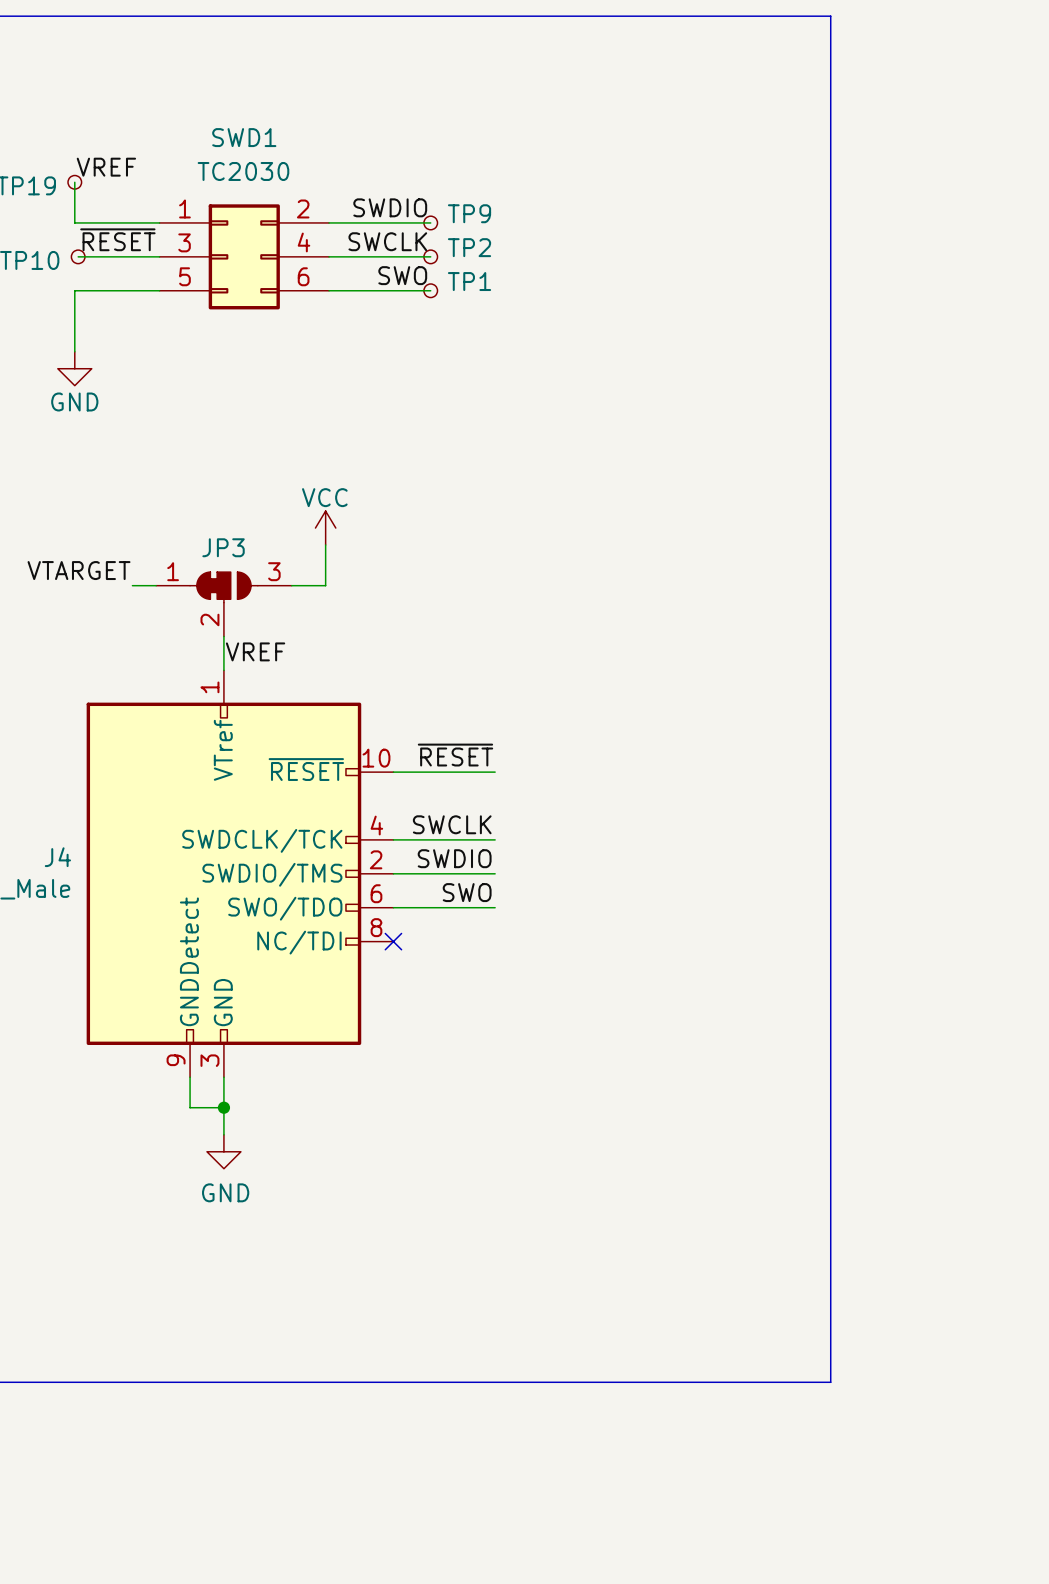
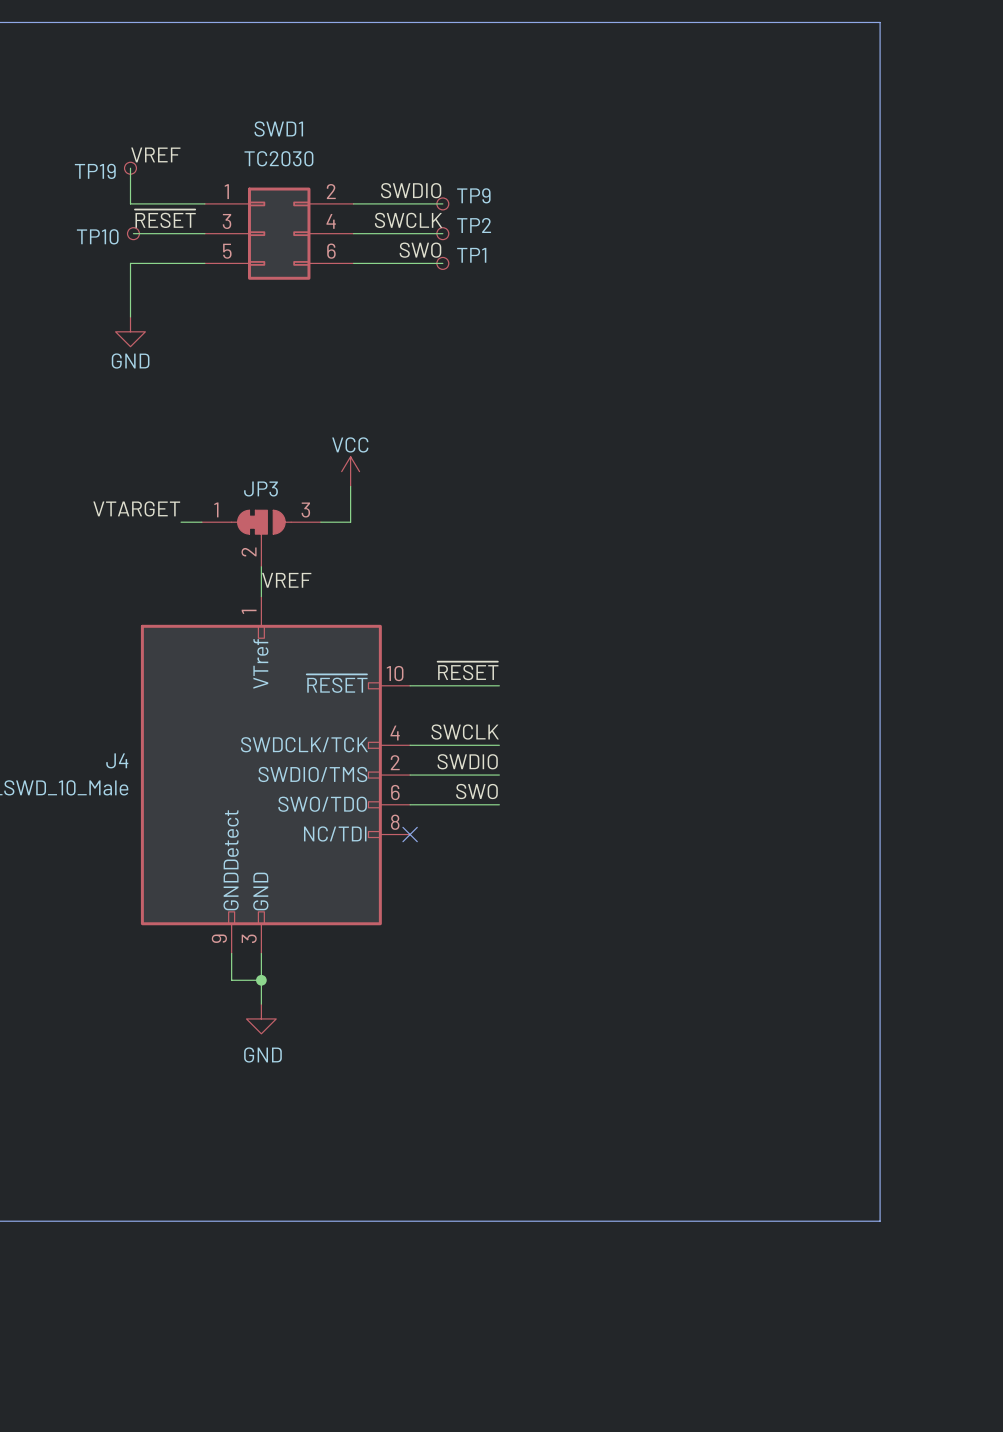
line: (830, 16) (830, 1382) -> (793, 22) (880, 22) (880, 1221) (793, 1221)

